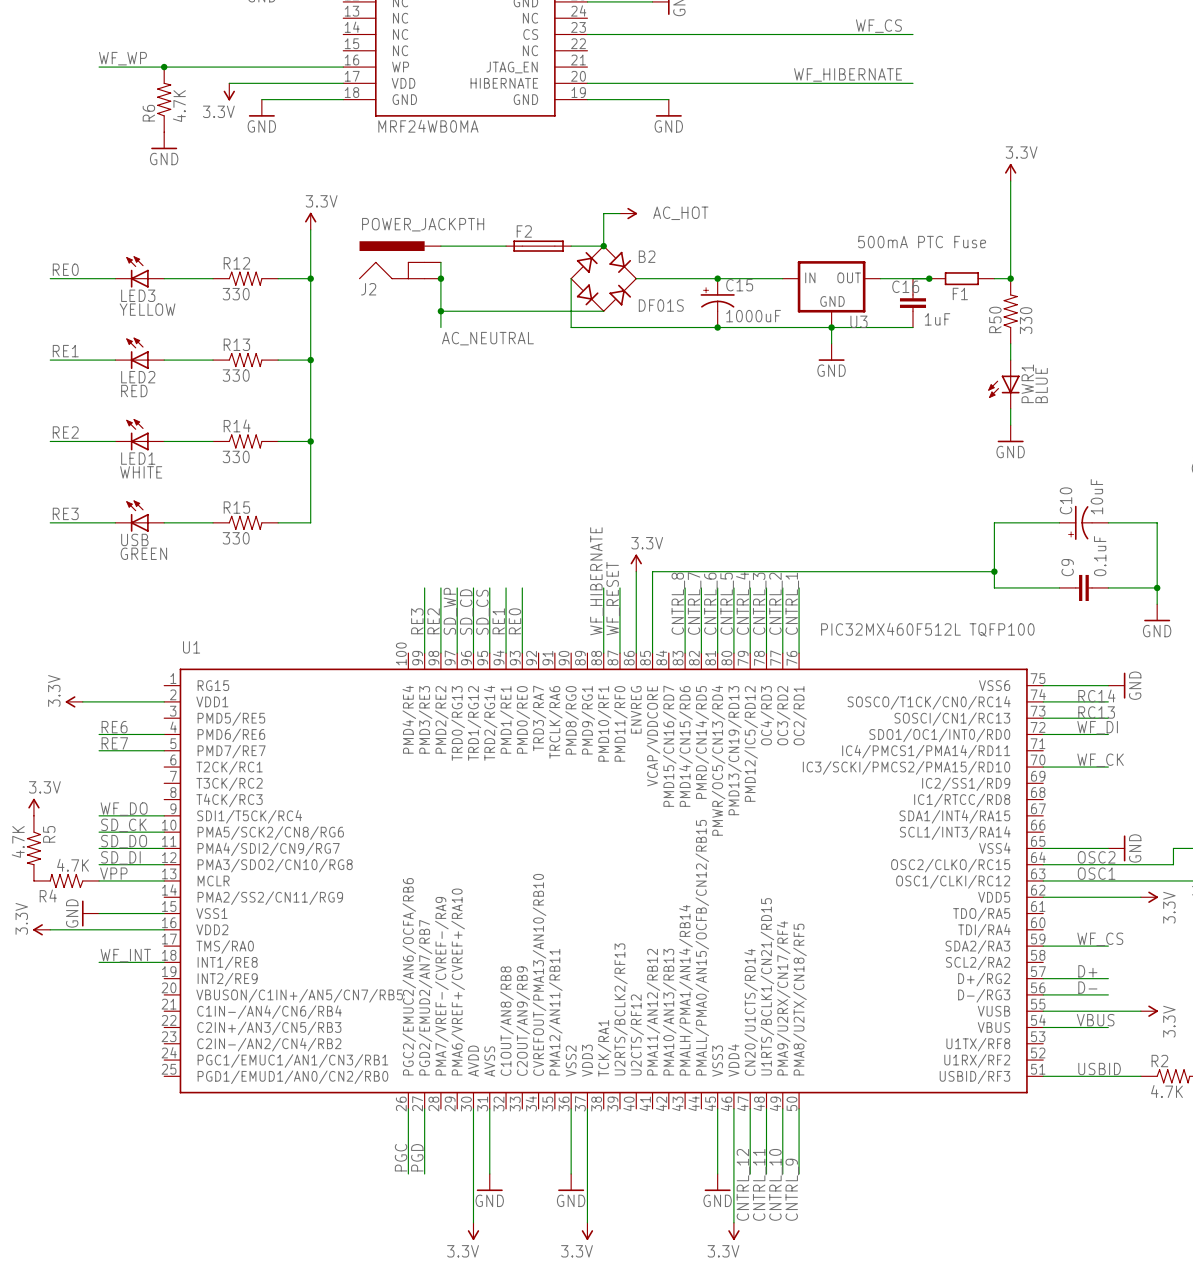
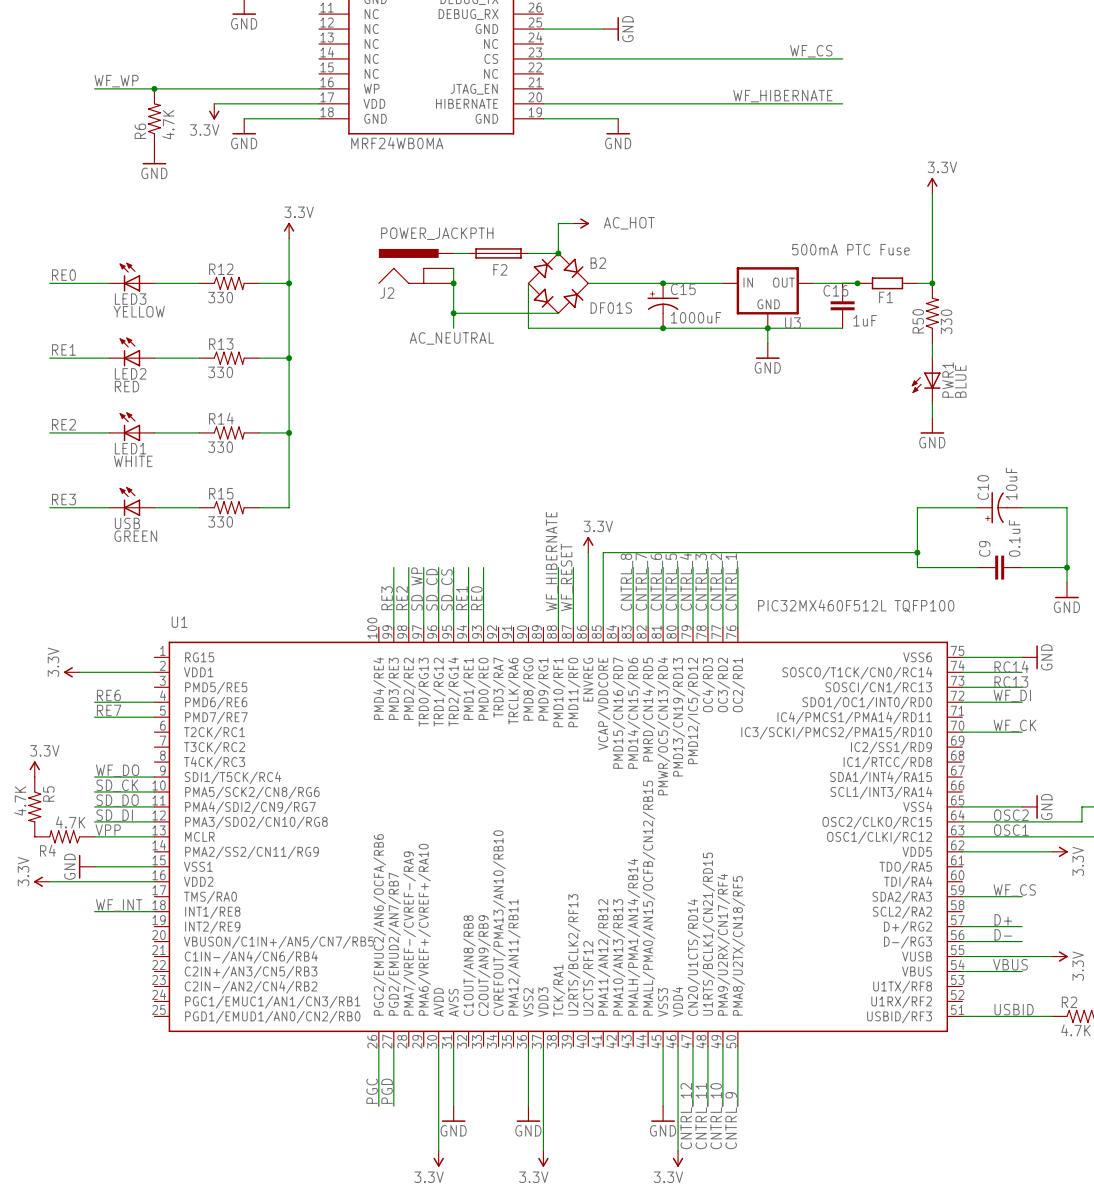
F2 name position: F2 (524, 231) -> F2 (500, 269)
J2 position: (399, 260) -> (416, 266)
wire: (440, 262) (440, 327) -> (453, 268) (453, 328)
junction: (440, 278) -> none
junction: none -> (453, 283)
wire: (440, 311) (489, 311) -> none
junction: (440, 311) -> none
junction: none -> (453, 313)

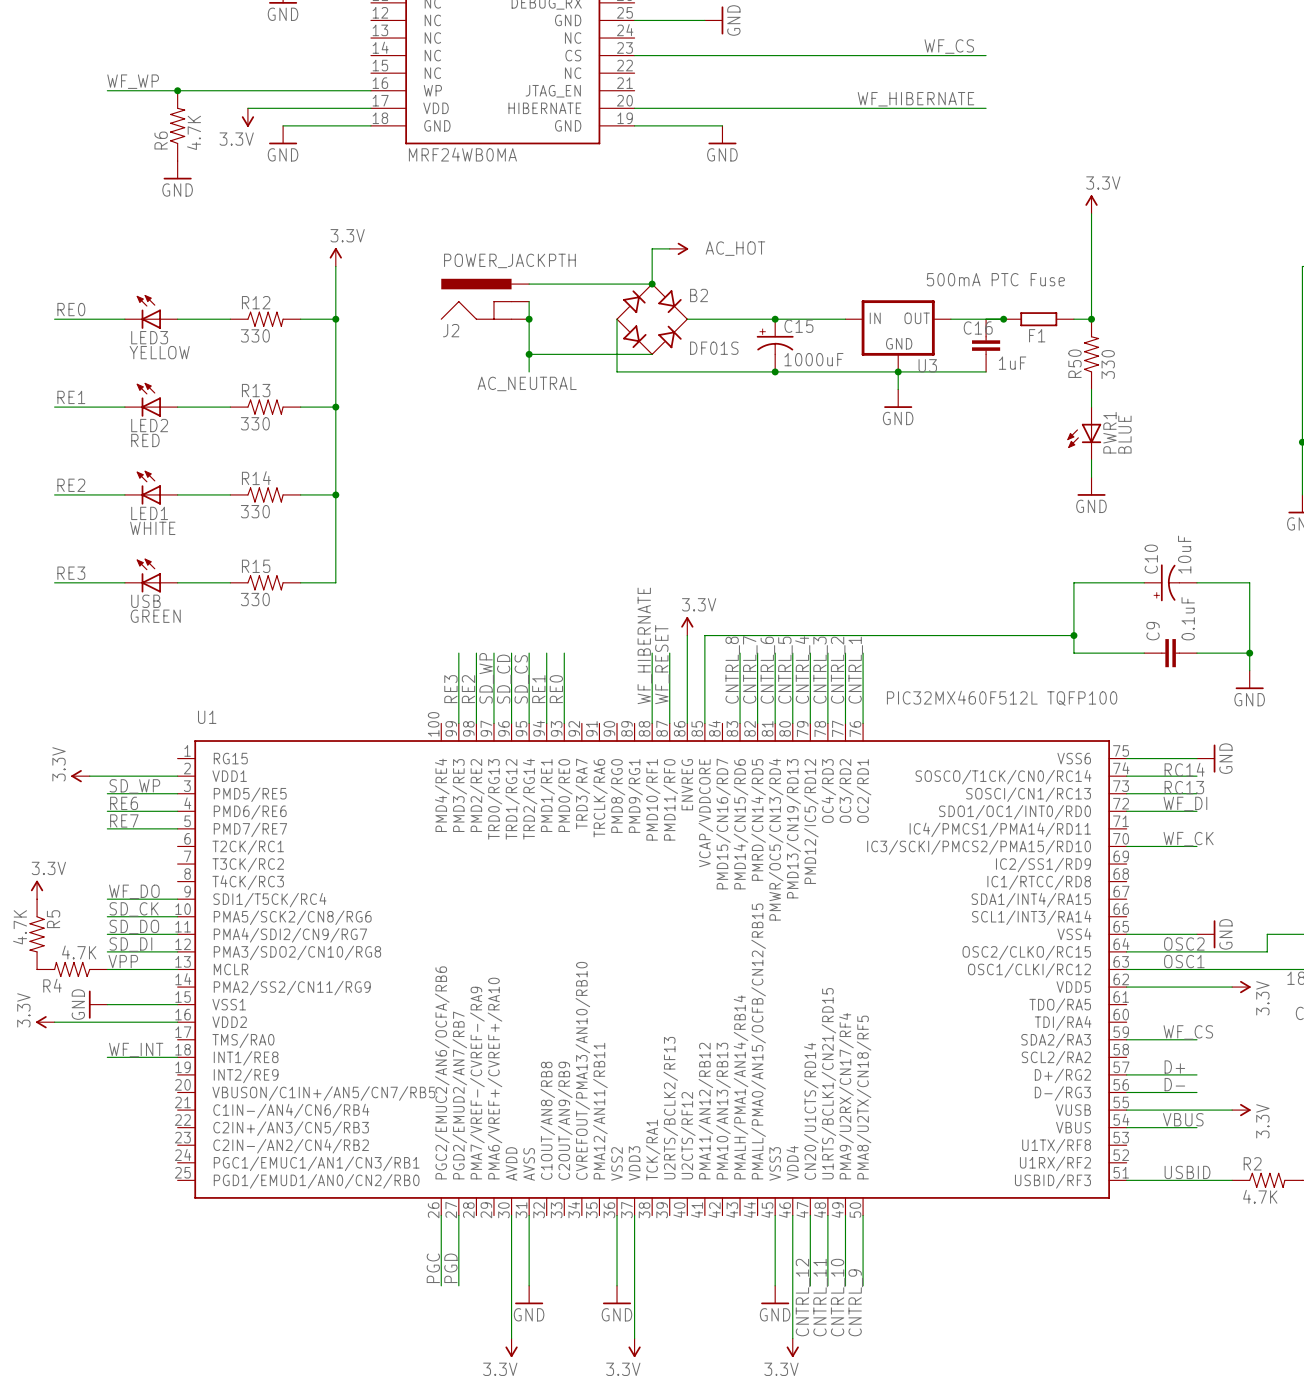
F2: (498, 253) -> none
label: none -> SD_WP (134, 786)
wire: none -> (107, 793) (177, 793)

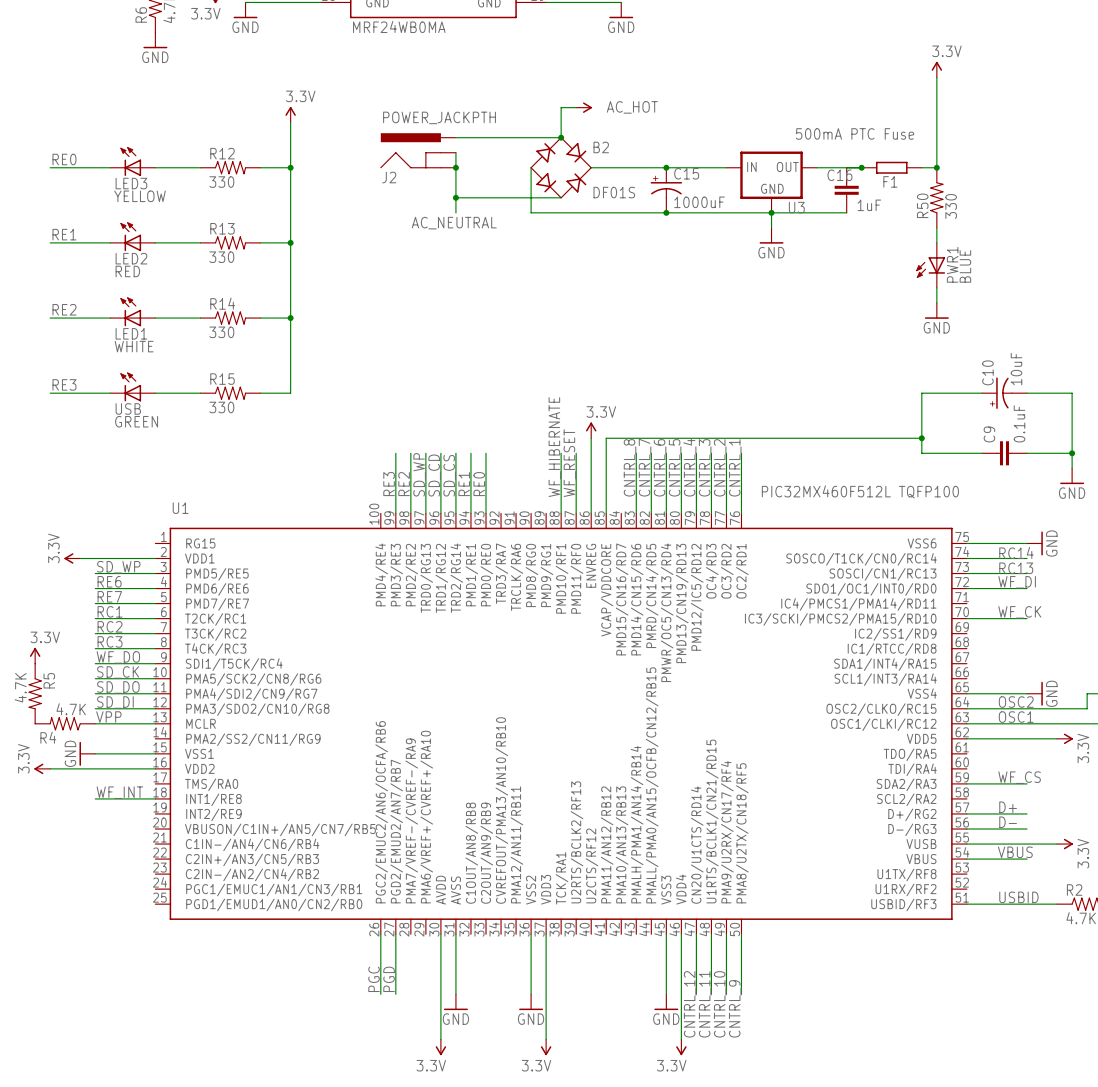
label: none -> RC1 (110, 611)
wire: none -> (95, 618) (155, 618)
label: none -> RC2 (110, 626)
wire: none -> (95, 633) (155, 633)
label: none -> RC3 (110, 641)
wire: none -> (95, 648) (155, 648)

